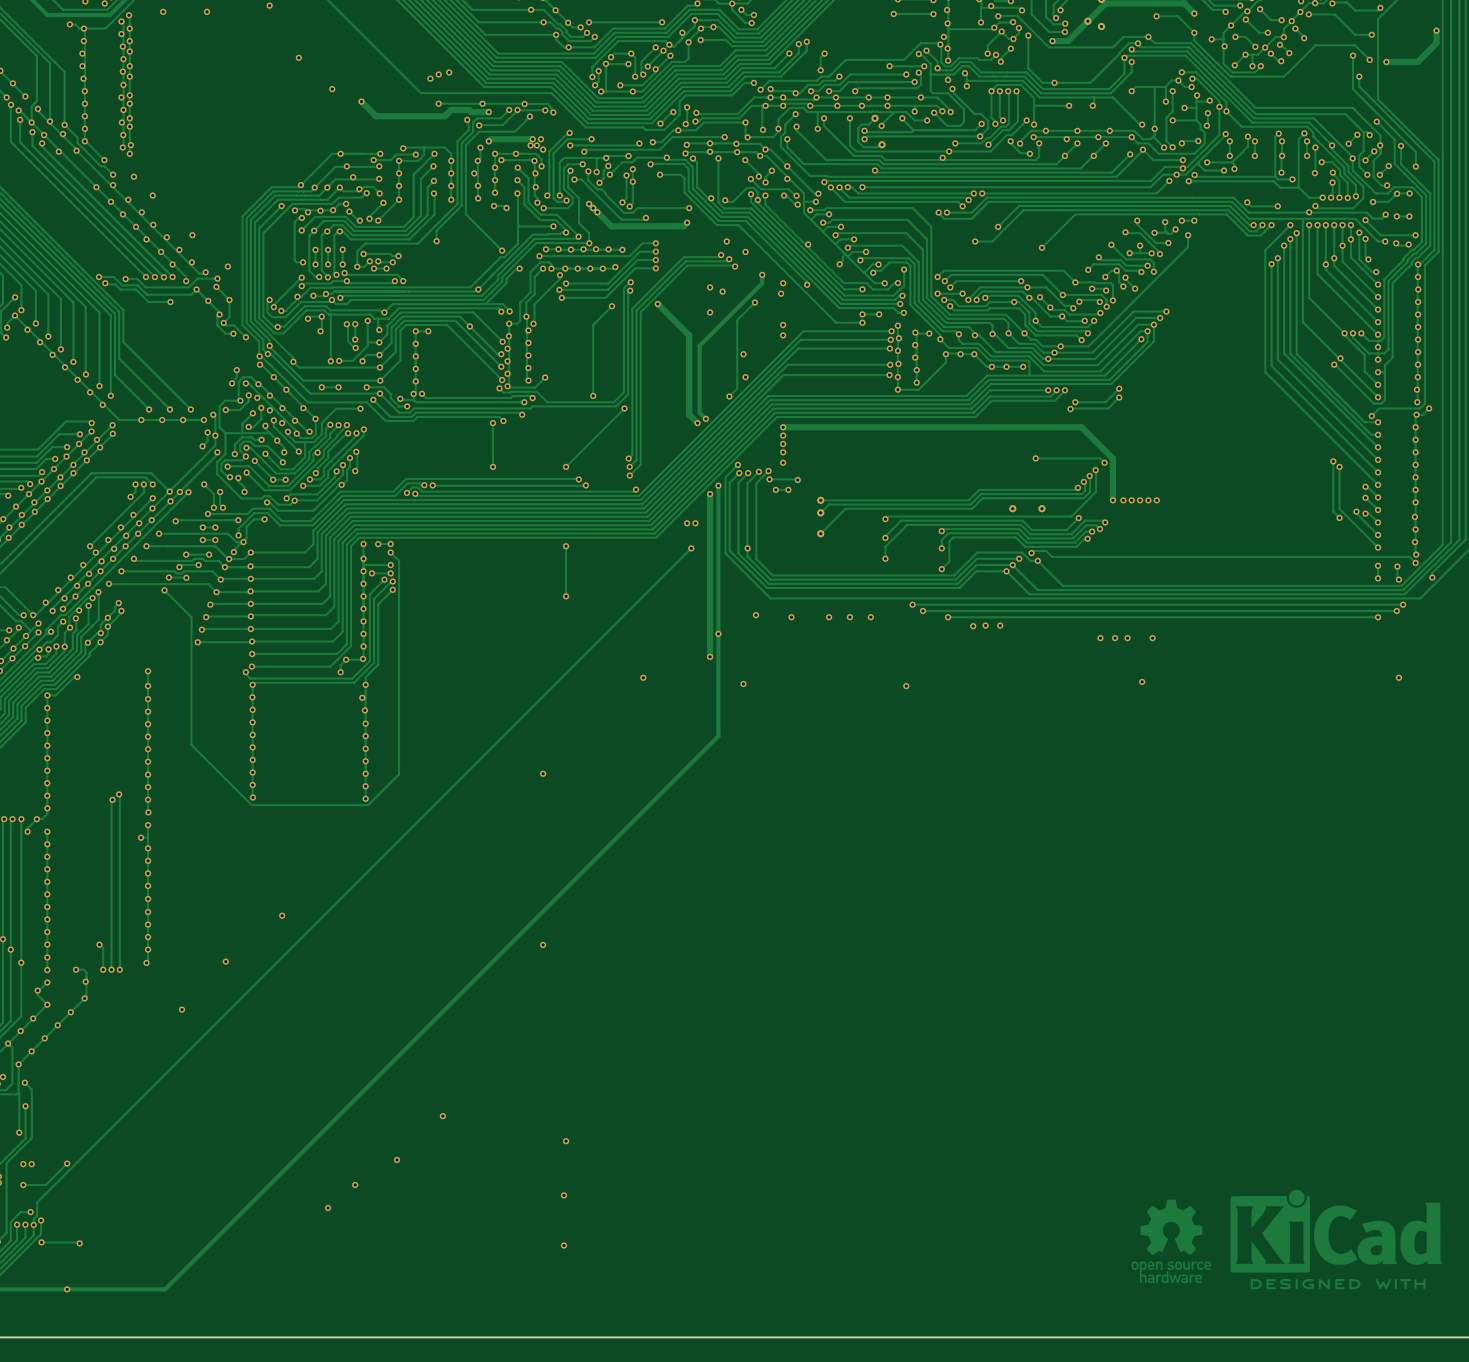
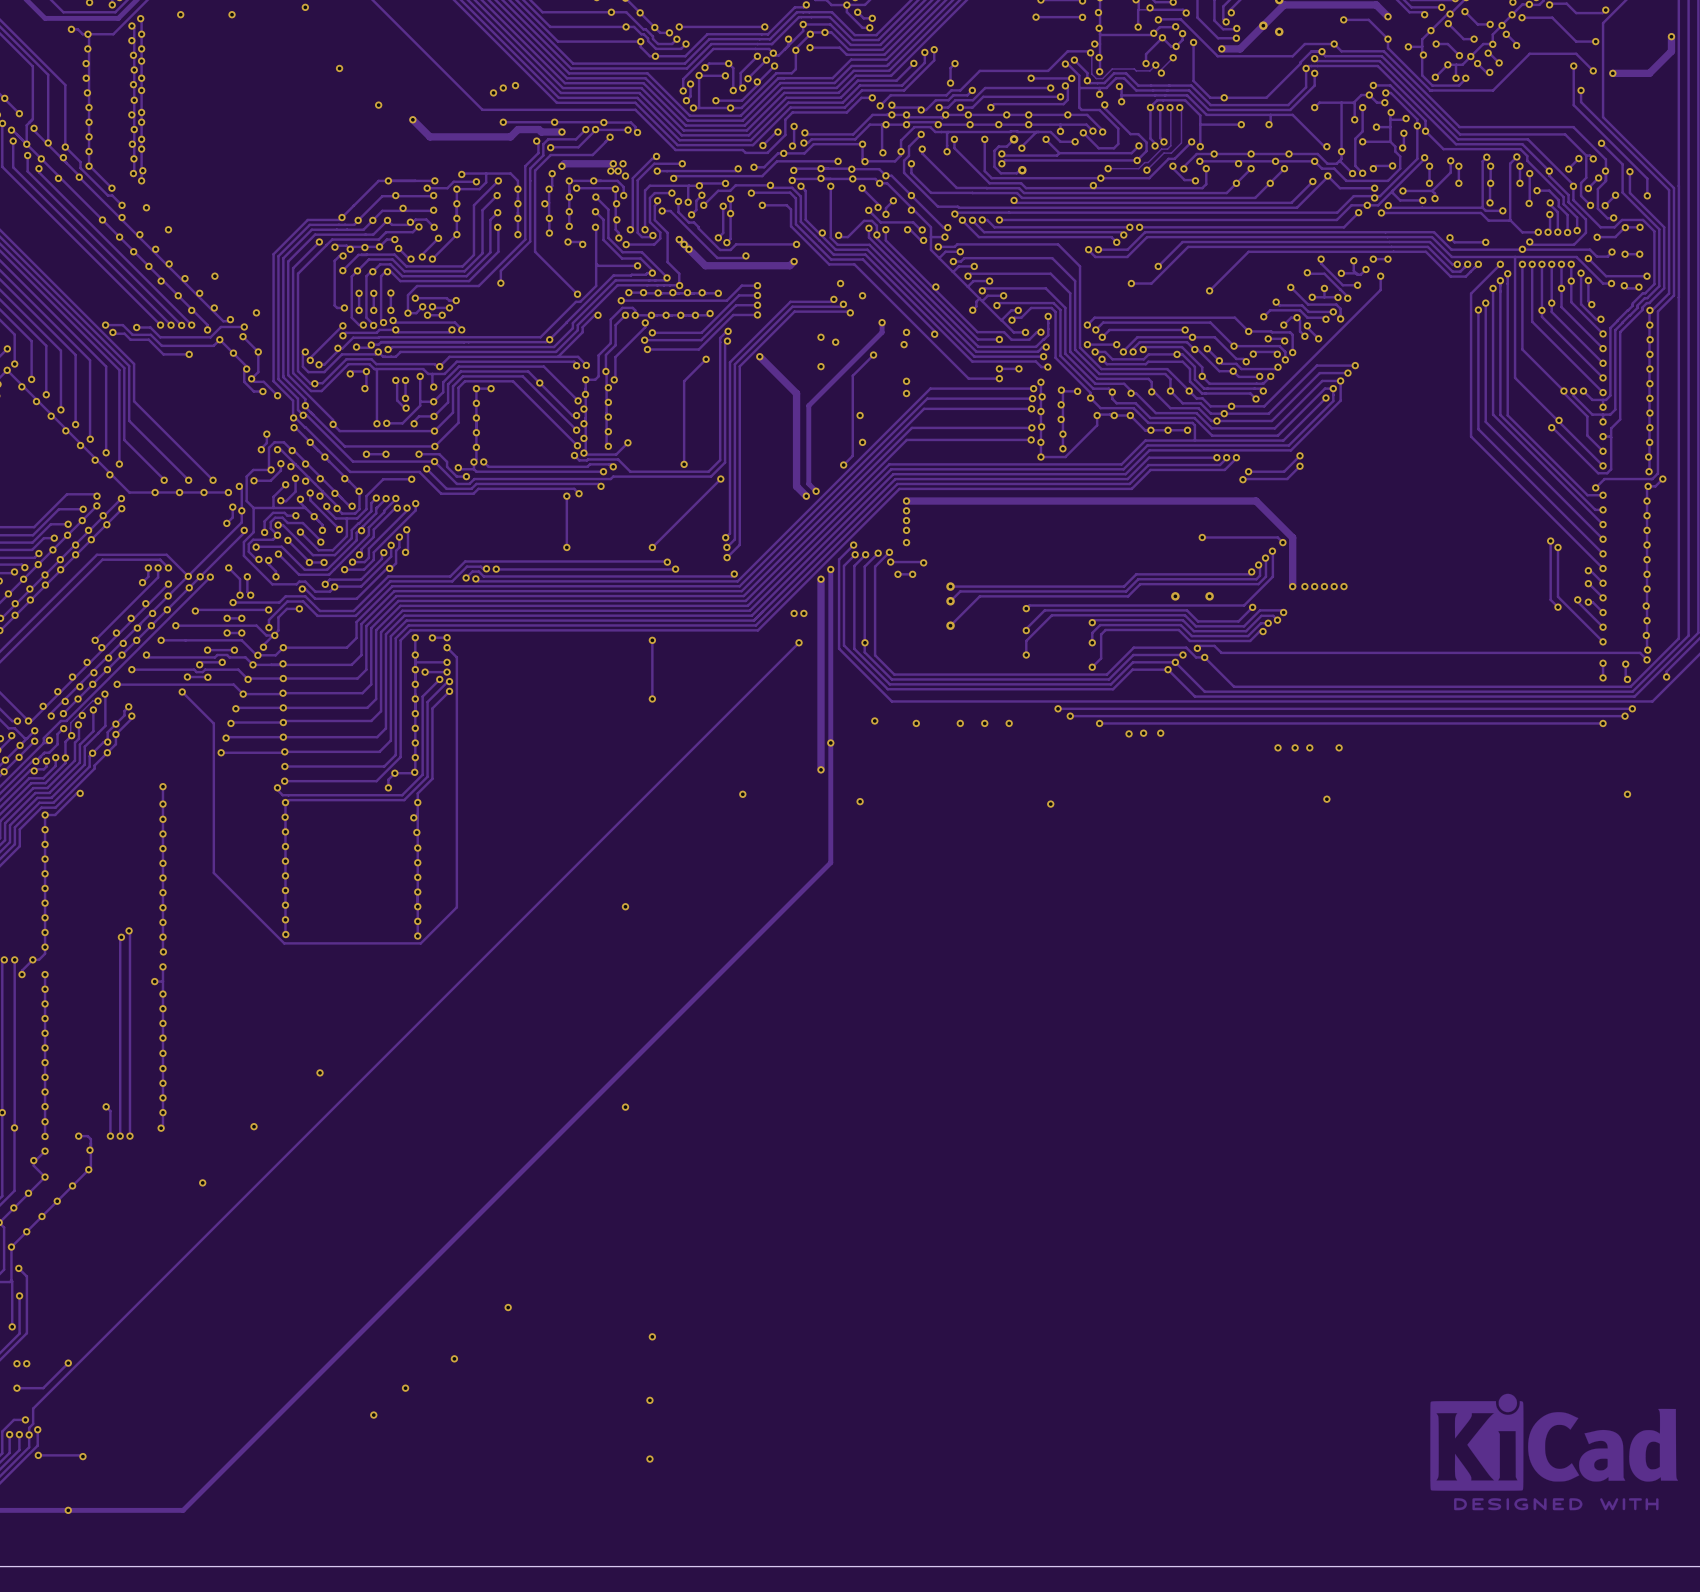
drawing: [1131, 1199, 1212, 1284] -> none

